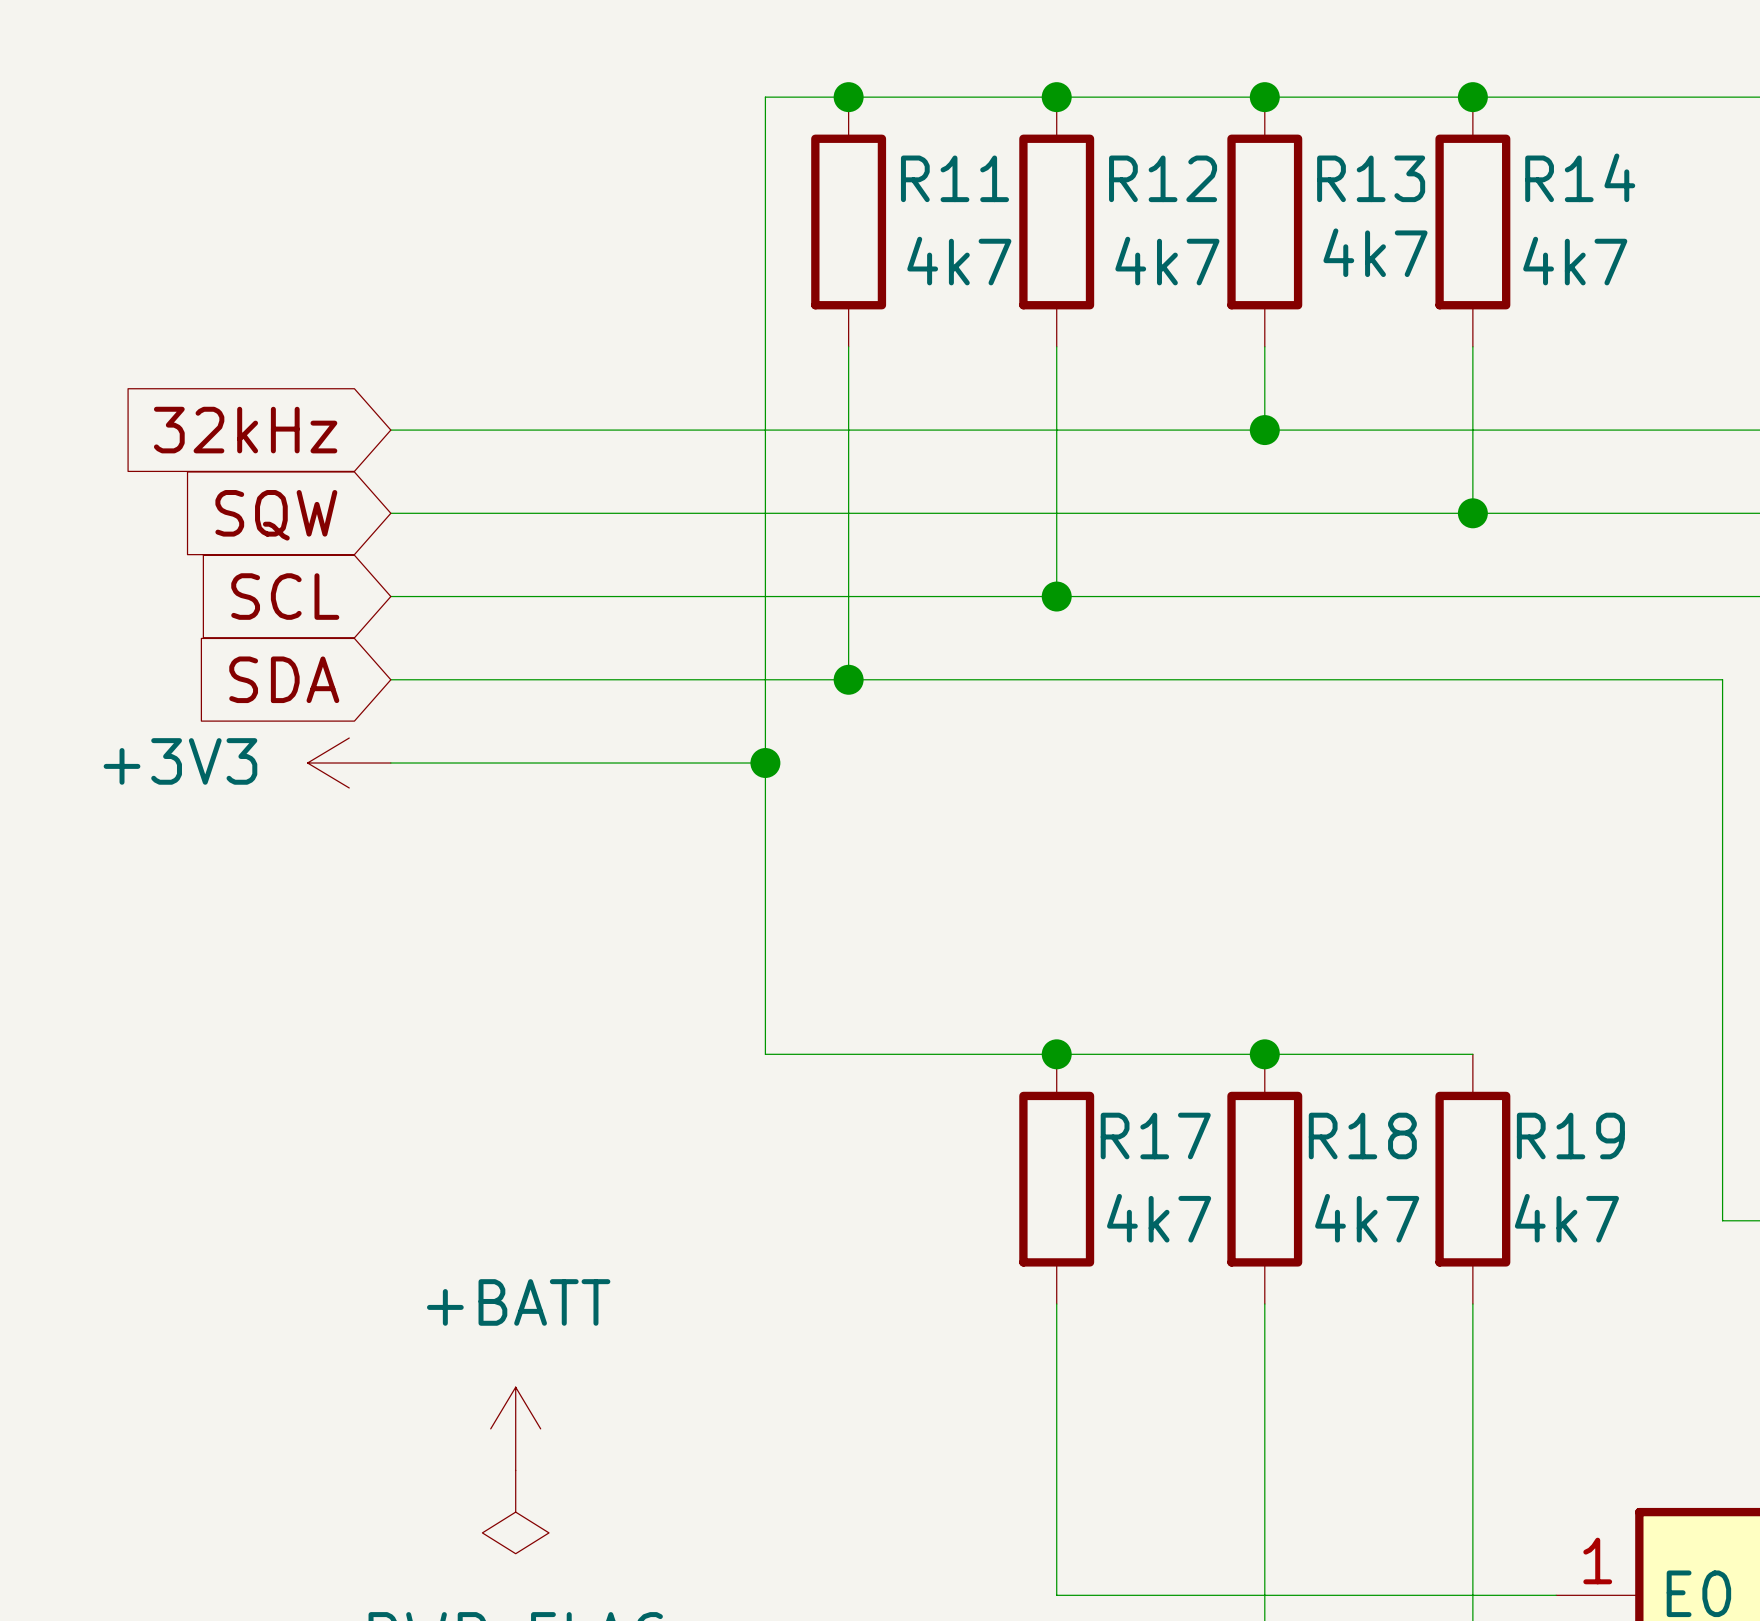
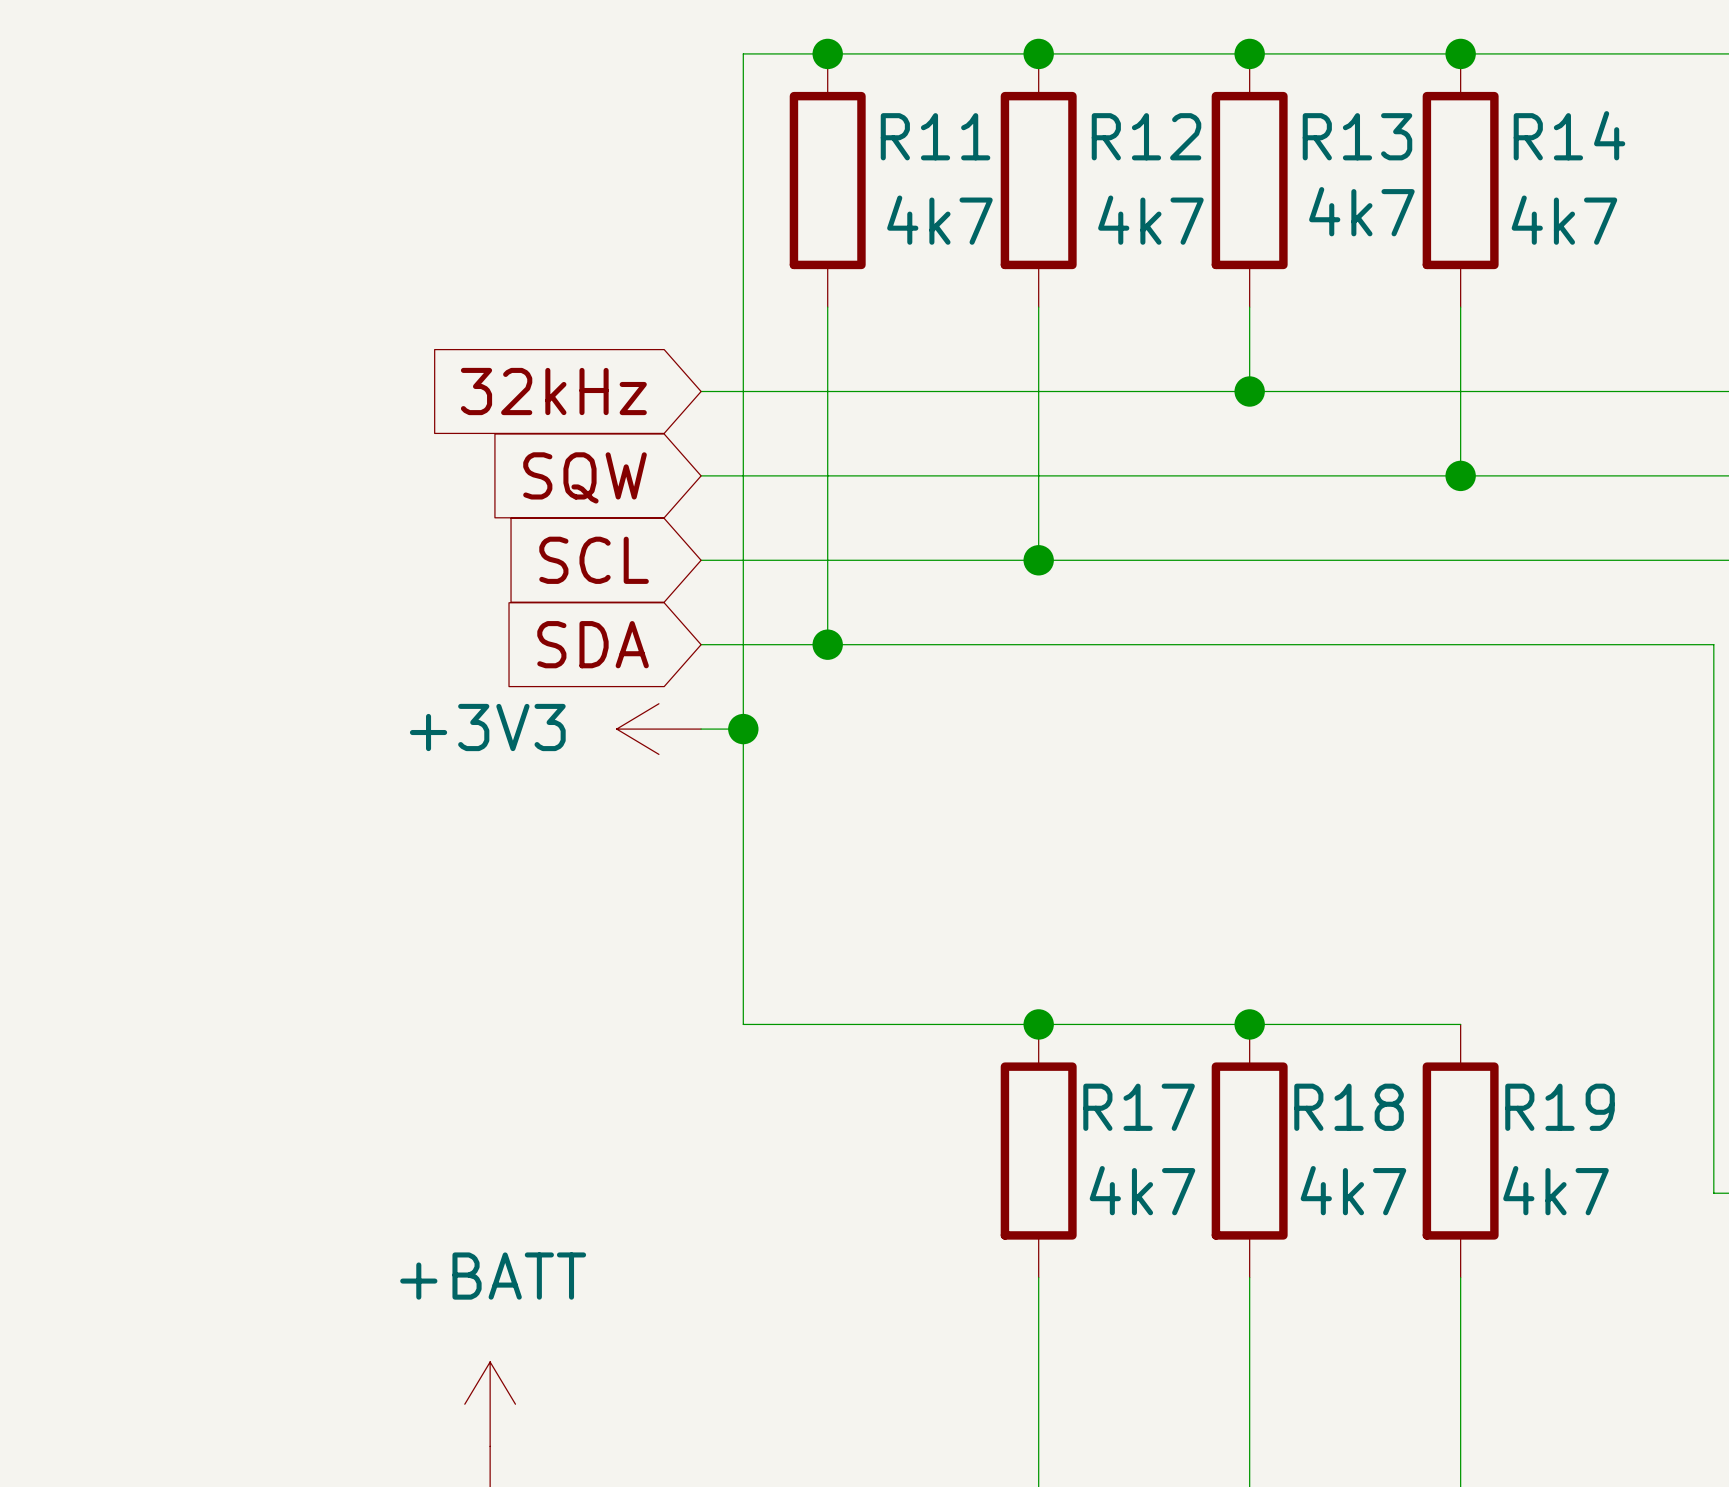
global label position: 32kHz (245, 430) -> 32kHz (553, 391)
wire: (390, 430) (723, 430) -> none
wire: (390, 513) (723, 513) -> none
global label position: SQW (276, 515) -> SQW (585, 477)
global label position: SCL (285, 596) -> SCL (594, 560)
wire: (390, 596) (723, 596) -> none
global label position: SDA (284, 679) -> SDA (593, 644)
wire: (390, 679) (723, 679) -> none
power symbol position: +3V3 (349, 763) -> +3V3 (658, 729)
wire: (390, 763) (723, 763) -> none

